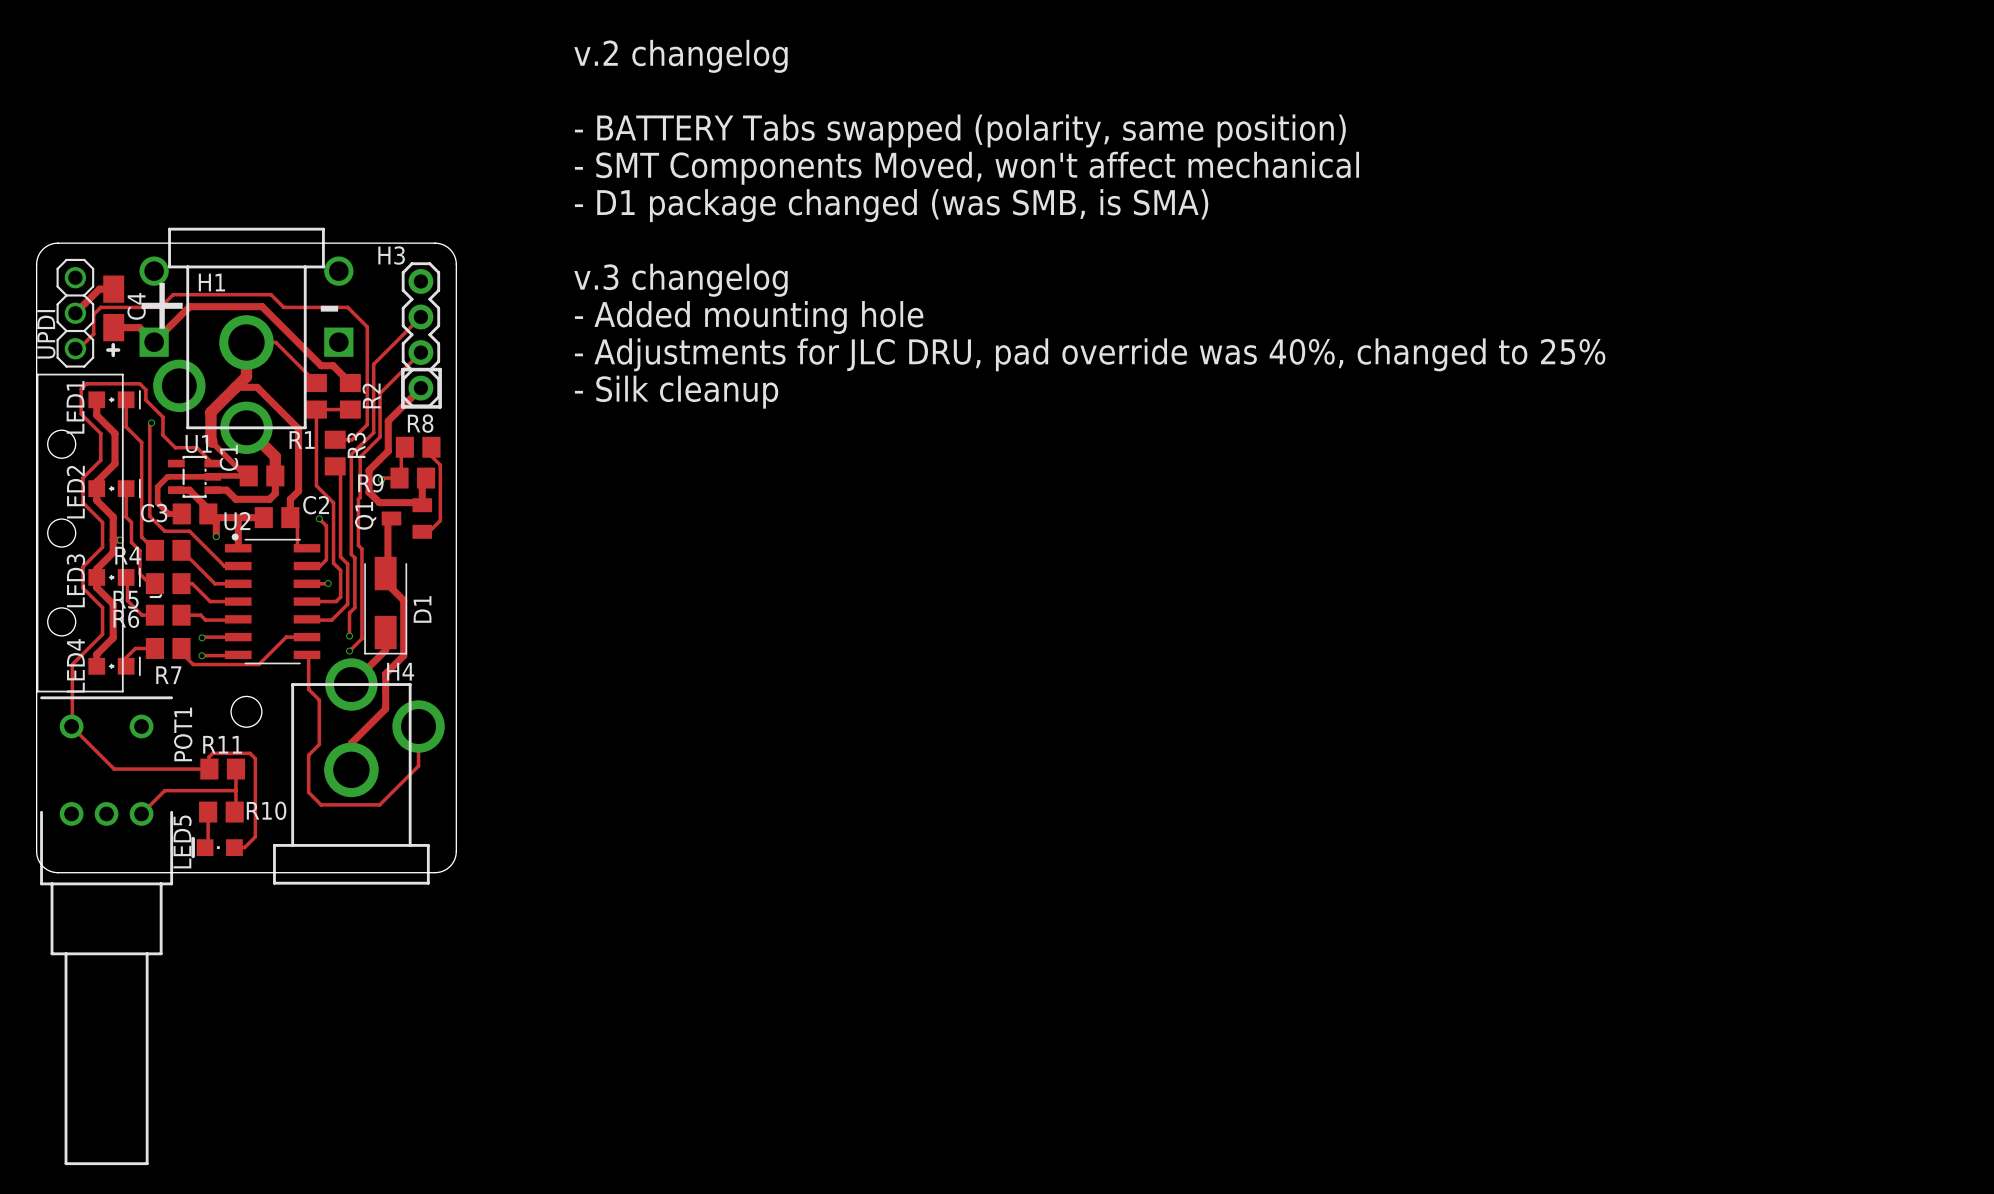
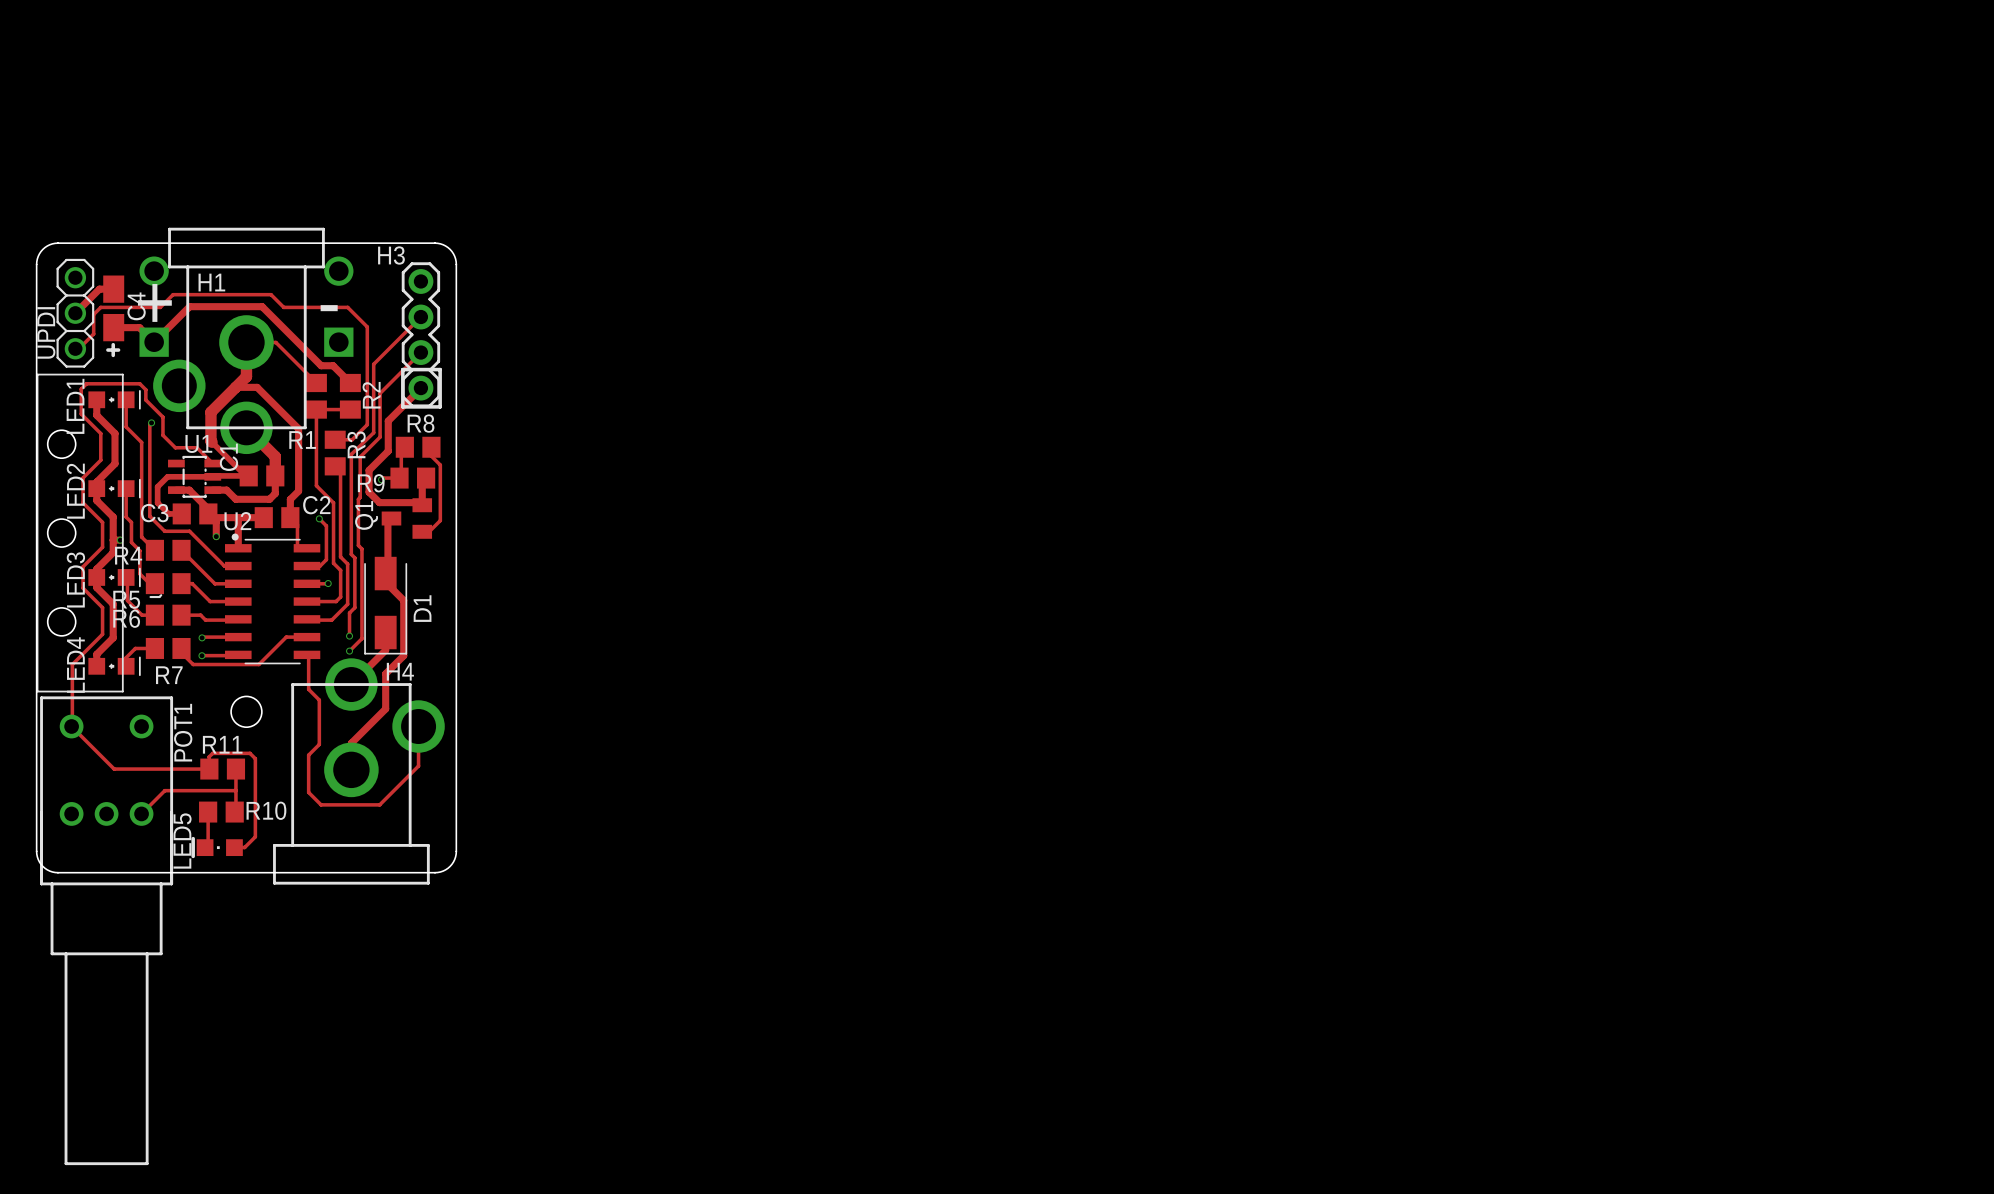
text: v.2 changelog (680, 56) -> none
text: - BATTERY Tabs swapped (polarity, same position) (960, 130) -> none
text: - SMT Components Moved, won't affect mechanical (966, 168) -> none
text: - D1 package changed (was SMB, is SMA) (891, 205) -> none
text: v.3 changelog (680, 280) -> none
text: - Added mounting hole (749, 317) -> none
text: - Adjustments for JLC DRU, pad override was 40%, changed to 25% (1090, 354) -> none
text: - Silk cleanup (676, 392) -> none
POT1 footprint: [40, 696, 174, 1166] -> [40, 696, 174, 1166]

